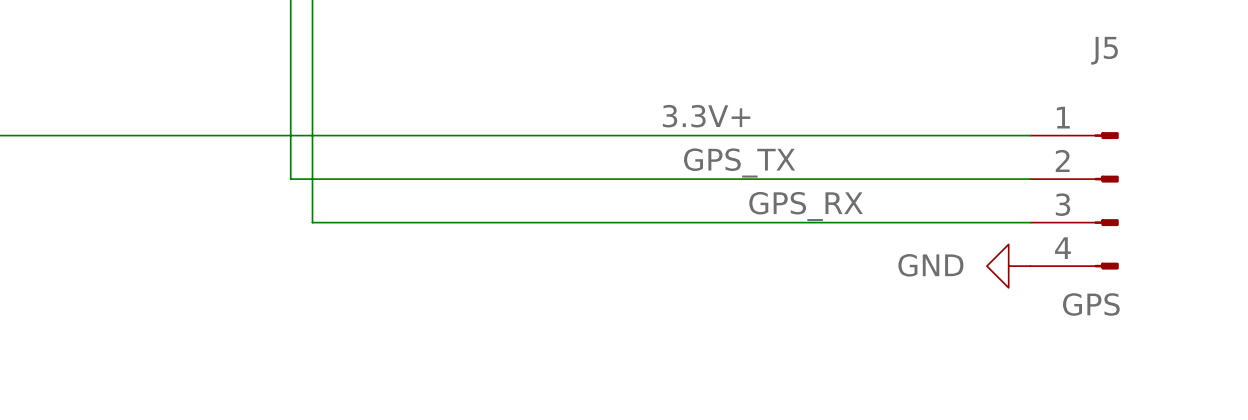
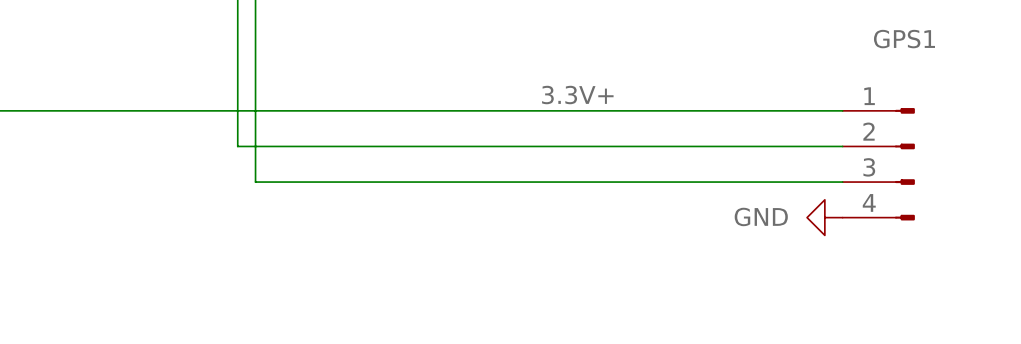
J5 name: J5 (1104, 50) -> GPS1 (904, 39)
label: GPS_TX (739, 163) -> none
label: GPS_RX (806, 206) -> none
J5 value: GPS (1091, 304) -> none

